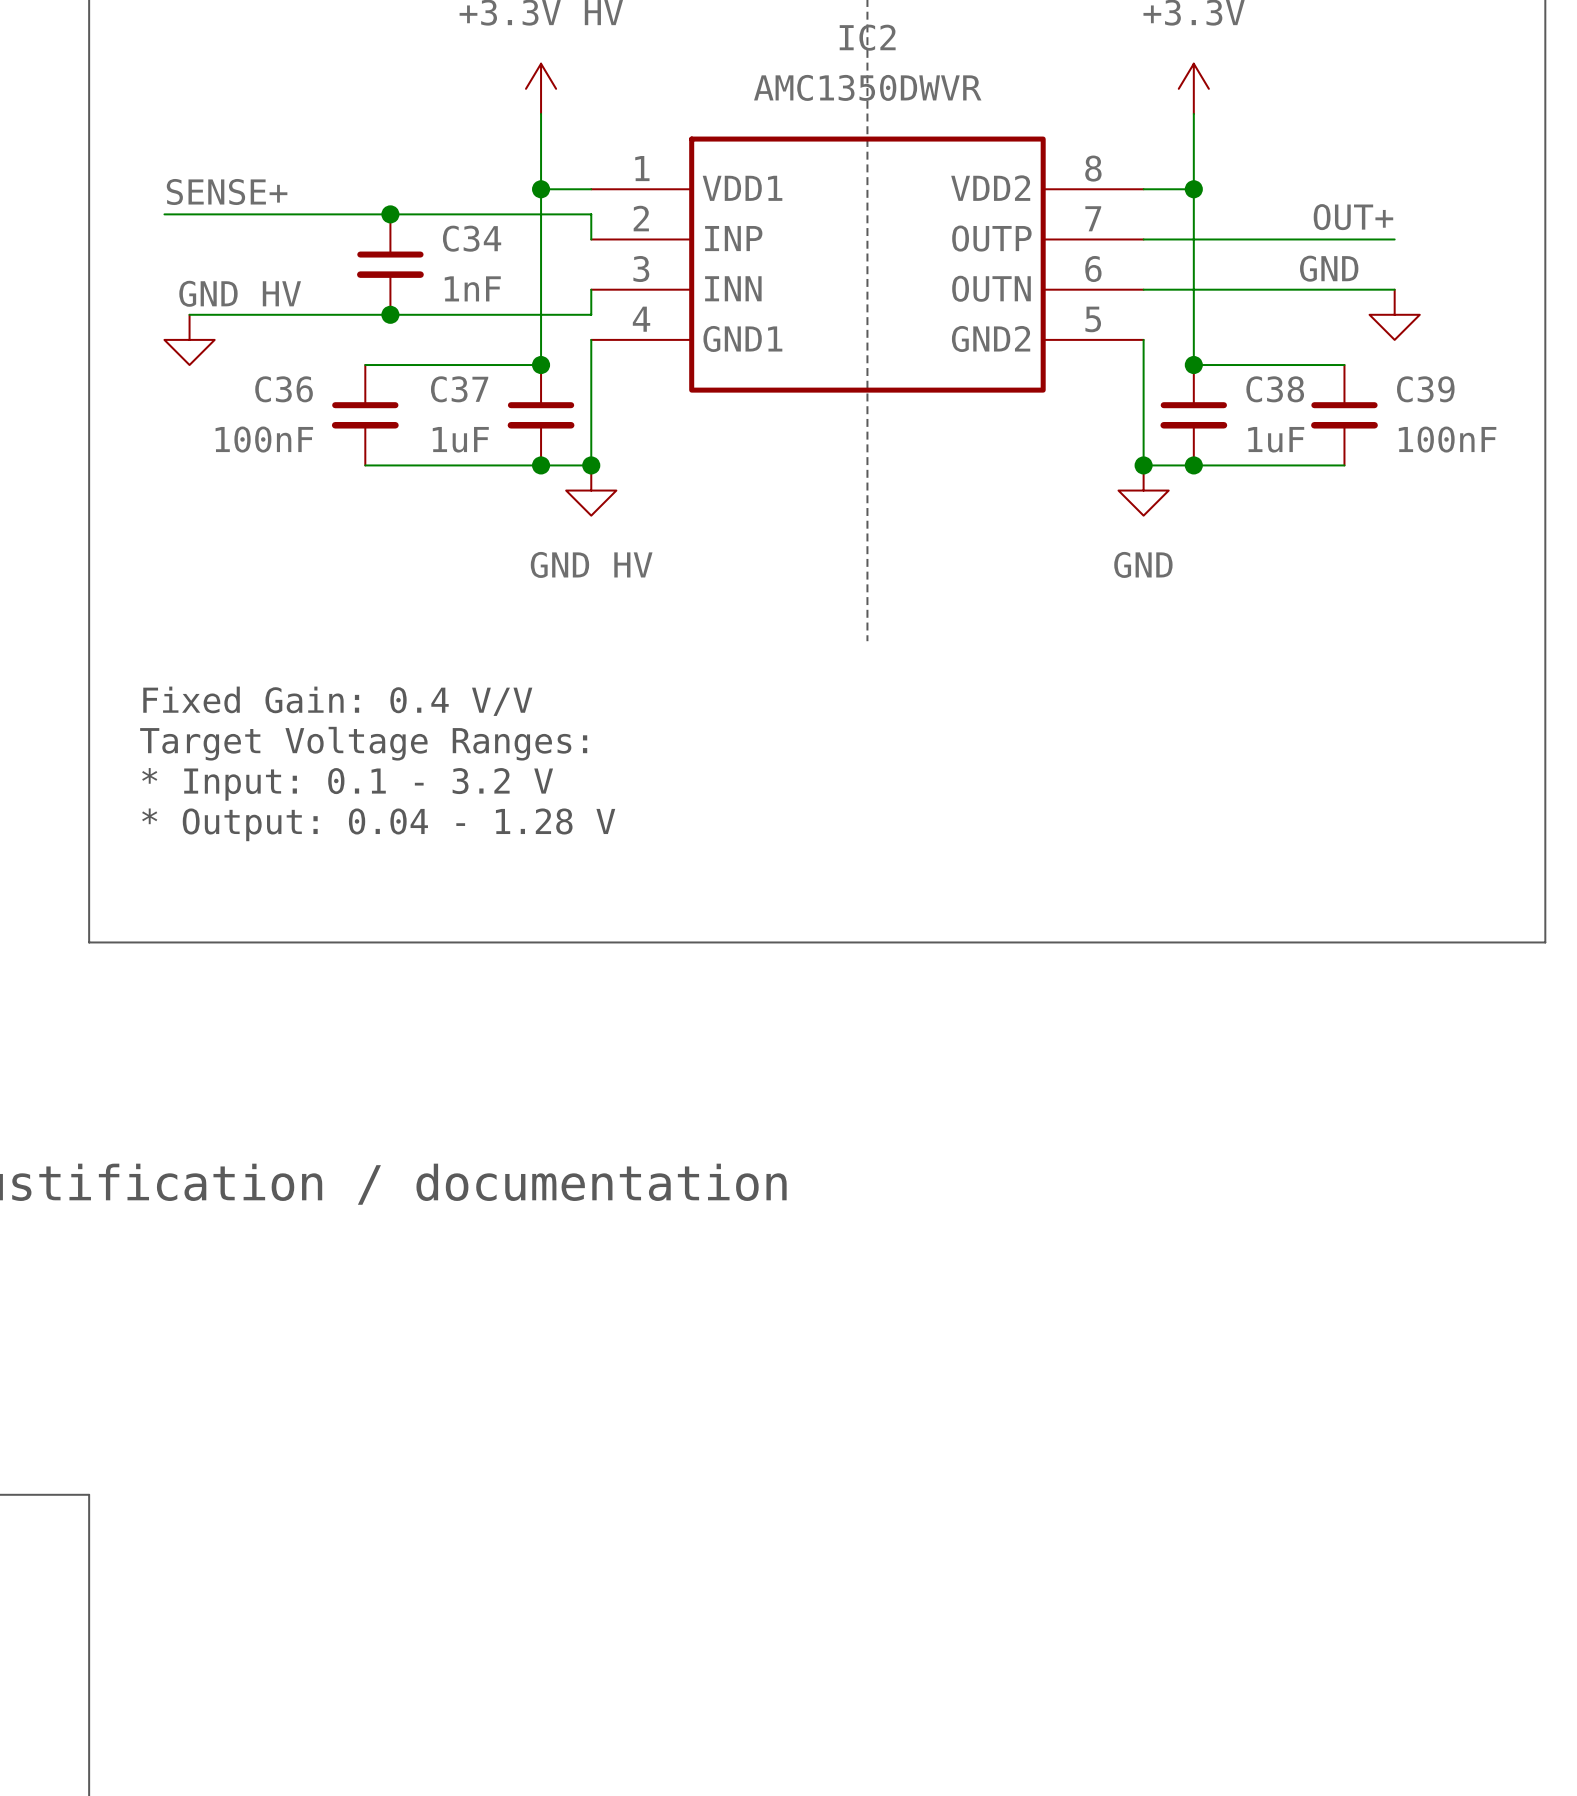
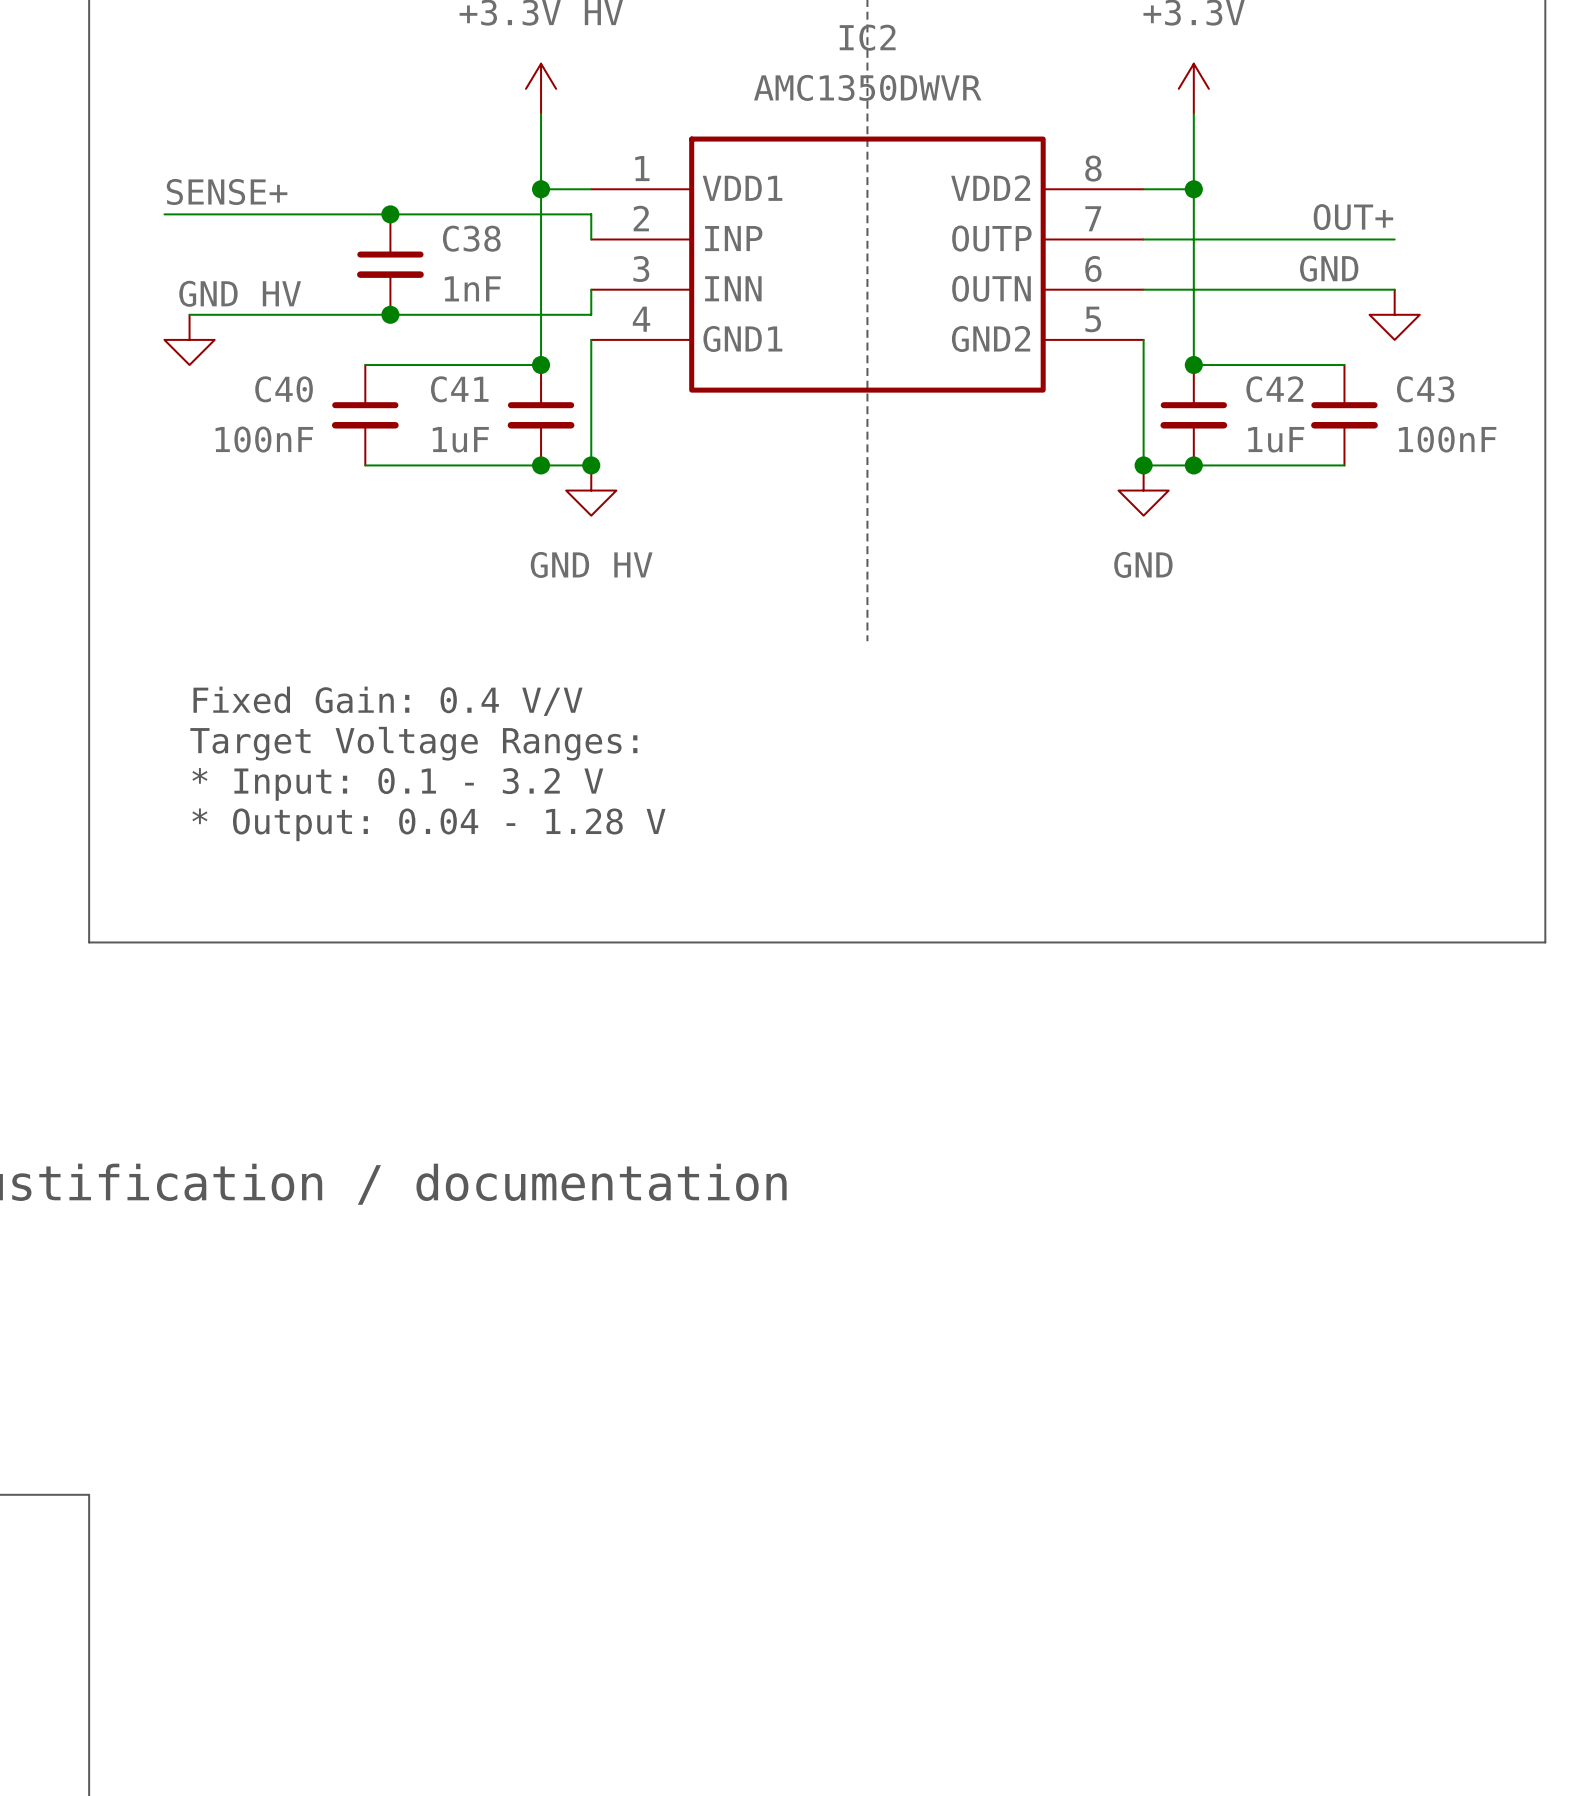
C34 name: C34 (472, 238) -> C38 (471, 238)
C36 name: C36 (284, 389) -> C40 (284, 389)
C37 name: C37 (459, 389) -> C41 (459, 389)
C38 name: C38 (1275, 389) -> C42 (1274, 389)
C39 name: C39 (1425, 389) -> C43 (1425, 389)
text position: Fixed Gain: 0.4 V/V (337, 701) -> Fixed Gain: 0.4 V/V (388, 701)
text position: Target Voltage Ranges: (363, 743) -> Target Voltage Ranges: (413, 743)
text position: * Input: 0.1 - 3.2 V (347, 784) -> * Input: 0.1 - 3.2 V (397, 784)
text position: * Output: 0.04 - 1.28 V (378, 824) -> * Output: 0.04 - 1.28 V (428, 824)

